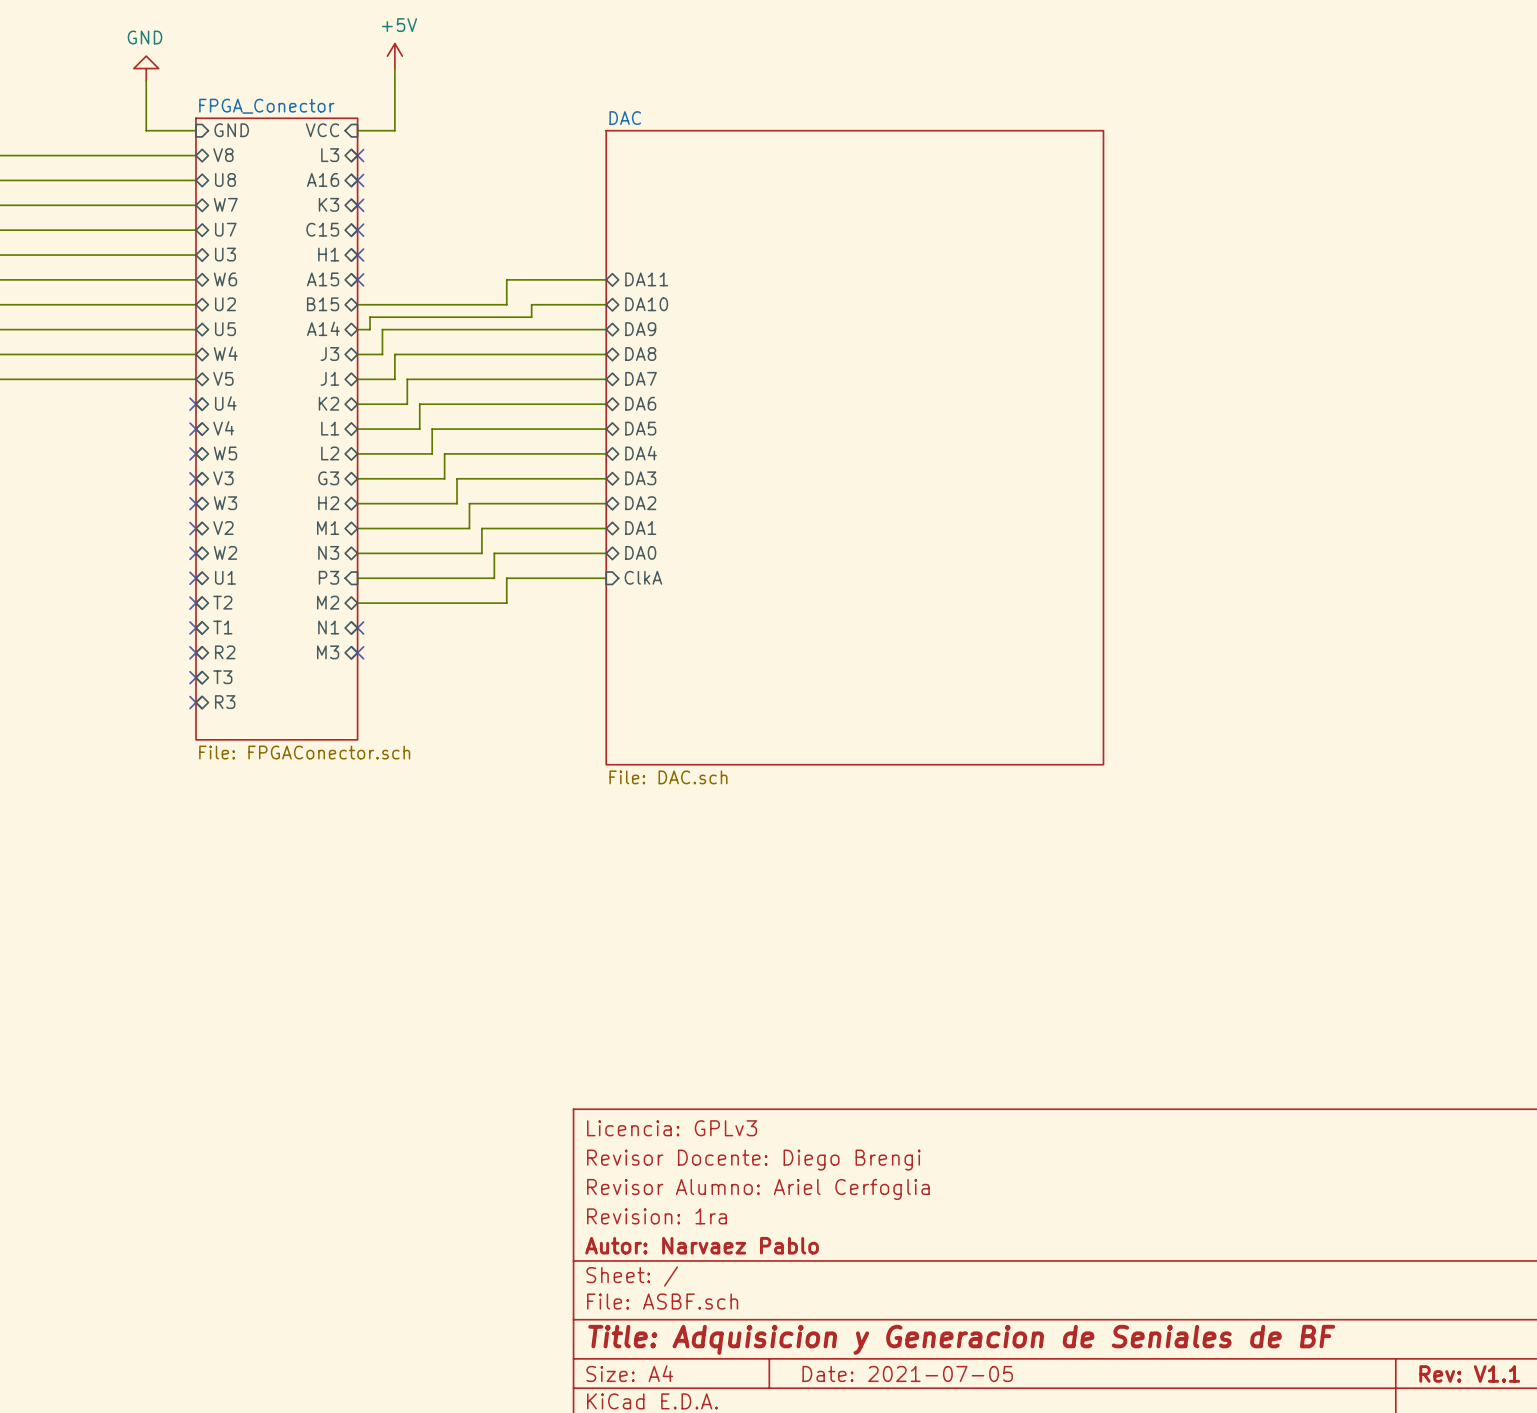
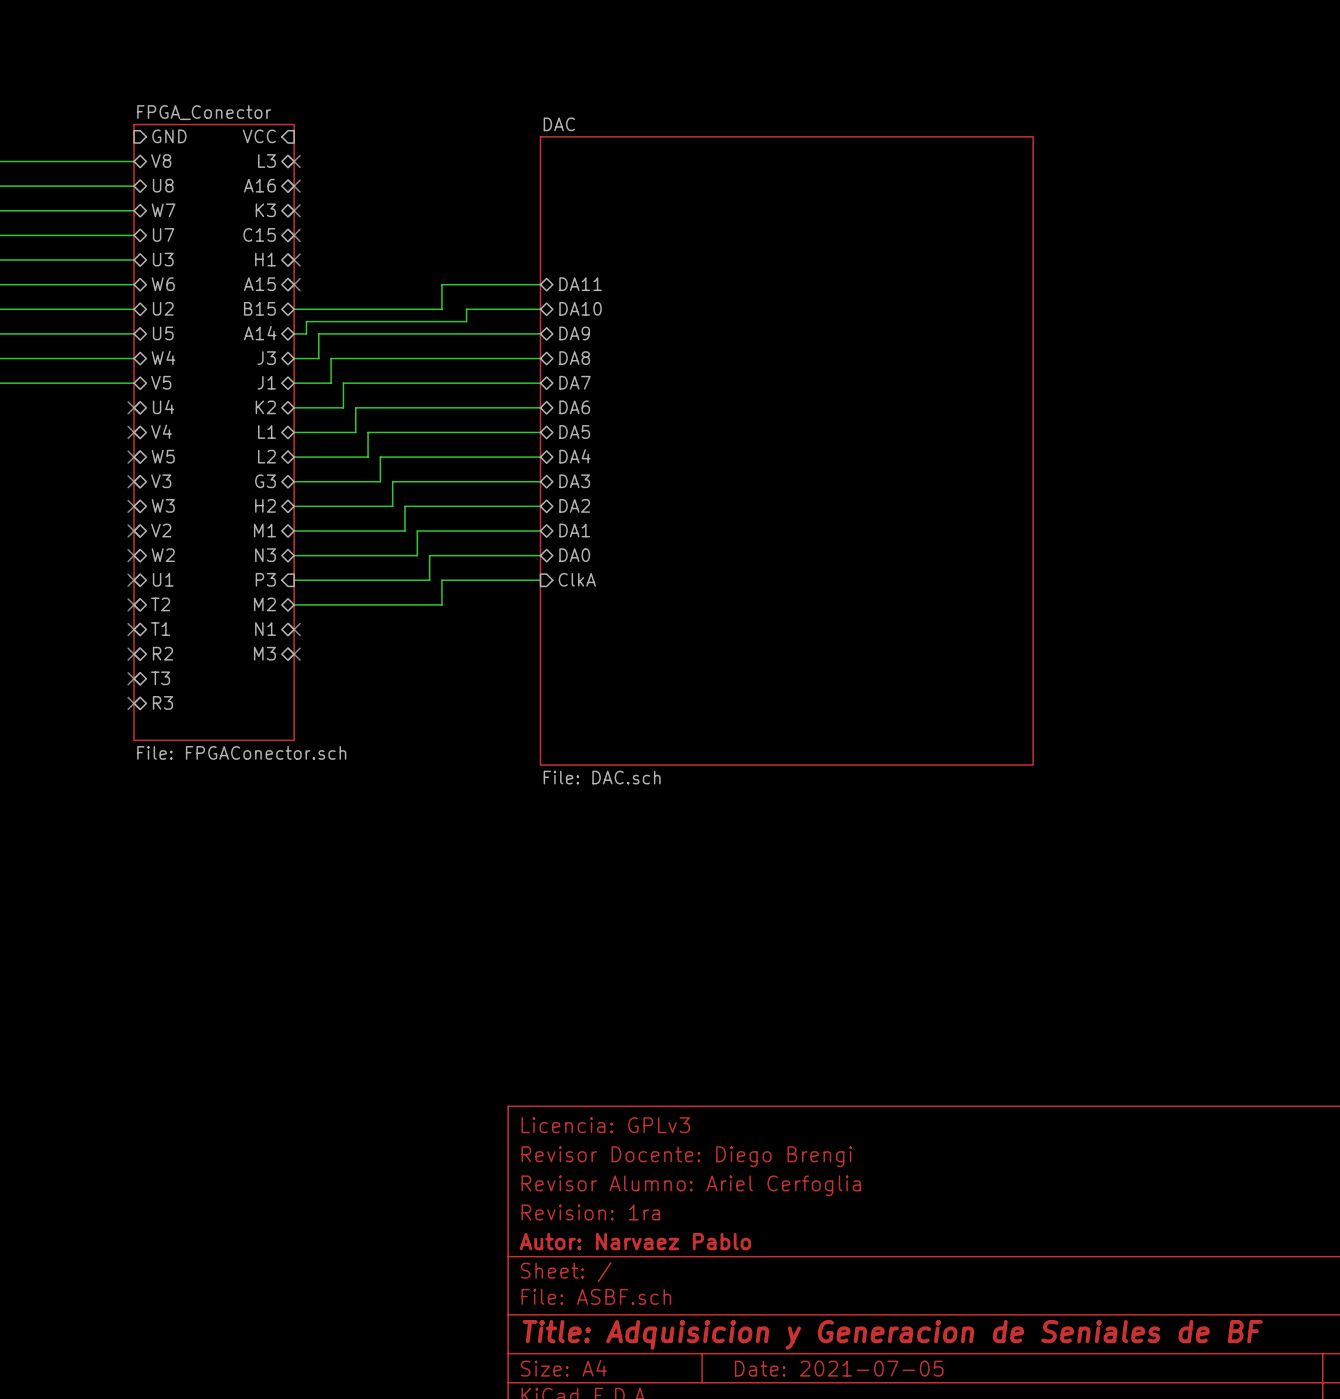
power symbol: +5V (394, 56) -> none
power symbol: GND (146, 68) -> none
wire: (394, 68) (394, 130) (357, 130) -> none
wire: (146, 80) (146, 130) (195, 130) -> none

